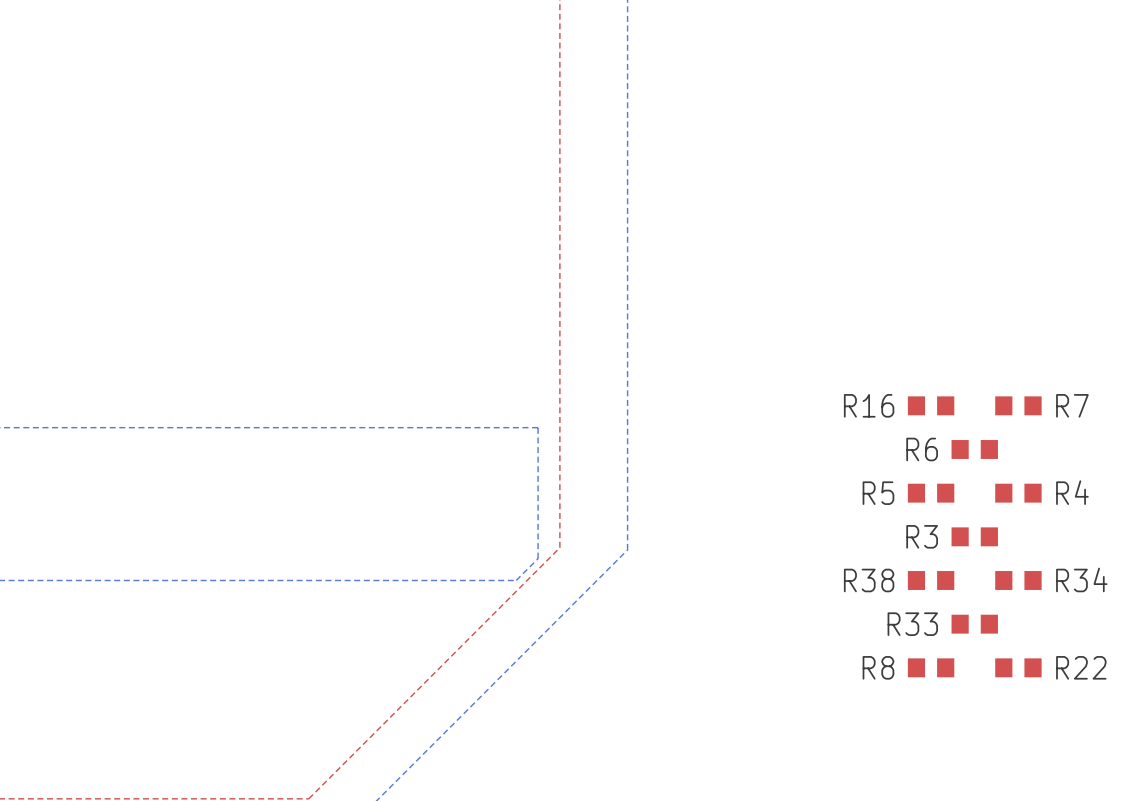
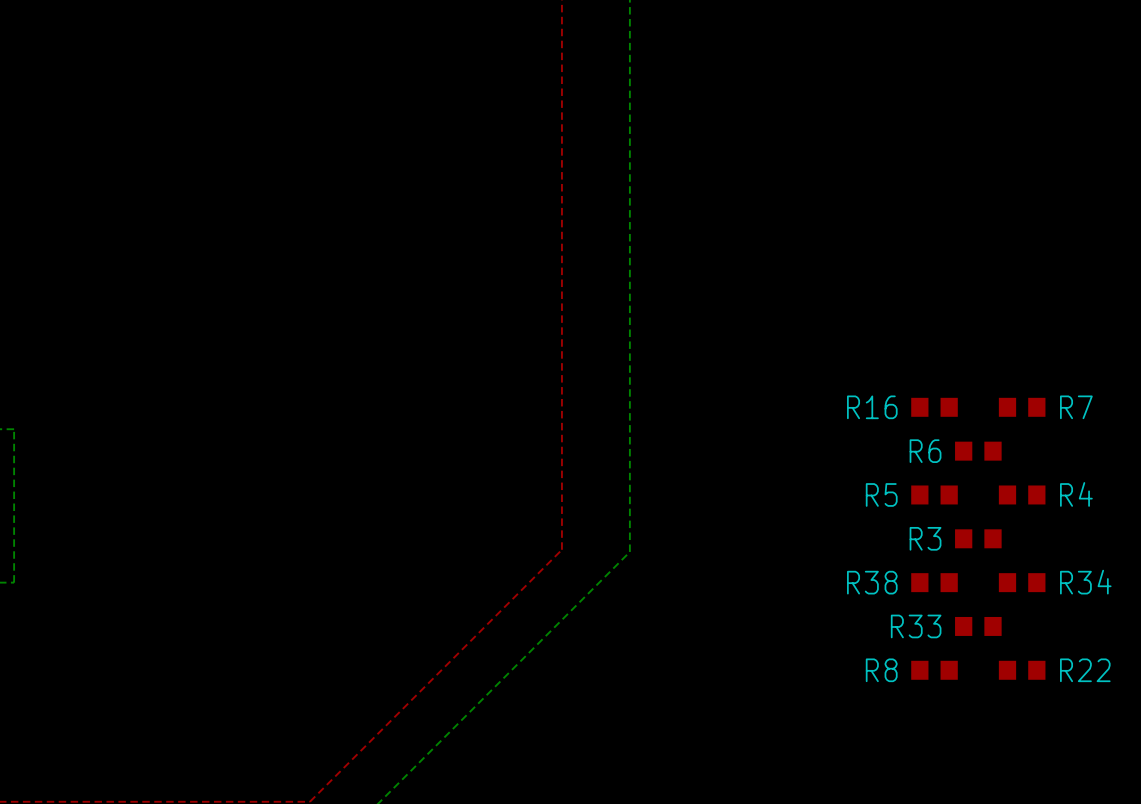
bottom zone outline: (14, 427) (538, 427) (538, 558) (516, 580) (14, 580) -> (14, 429) (14, 582)

